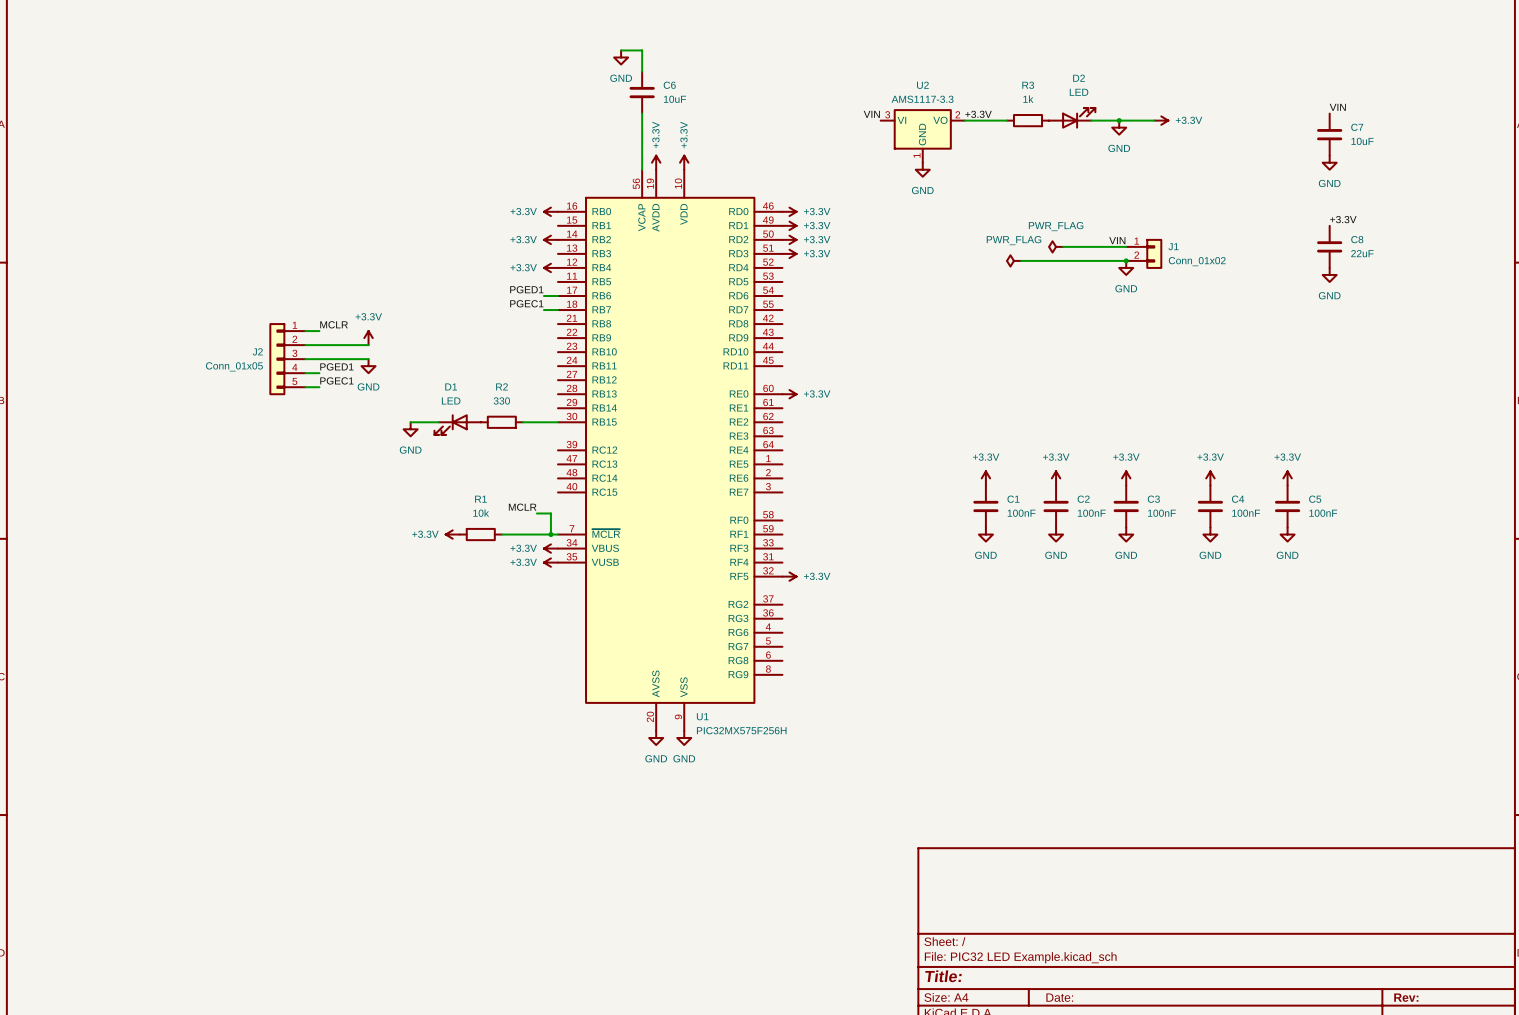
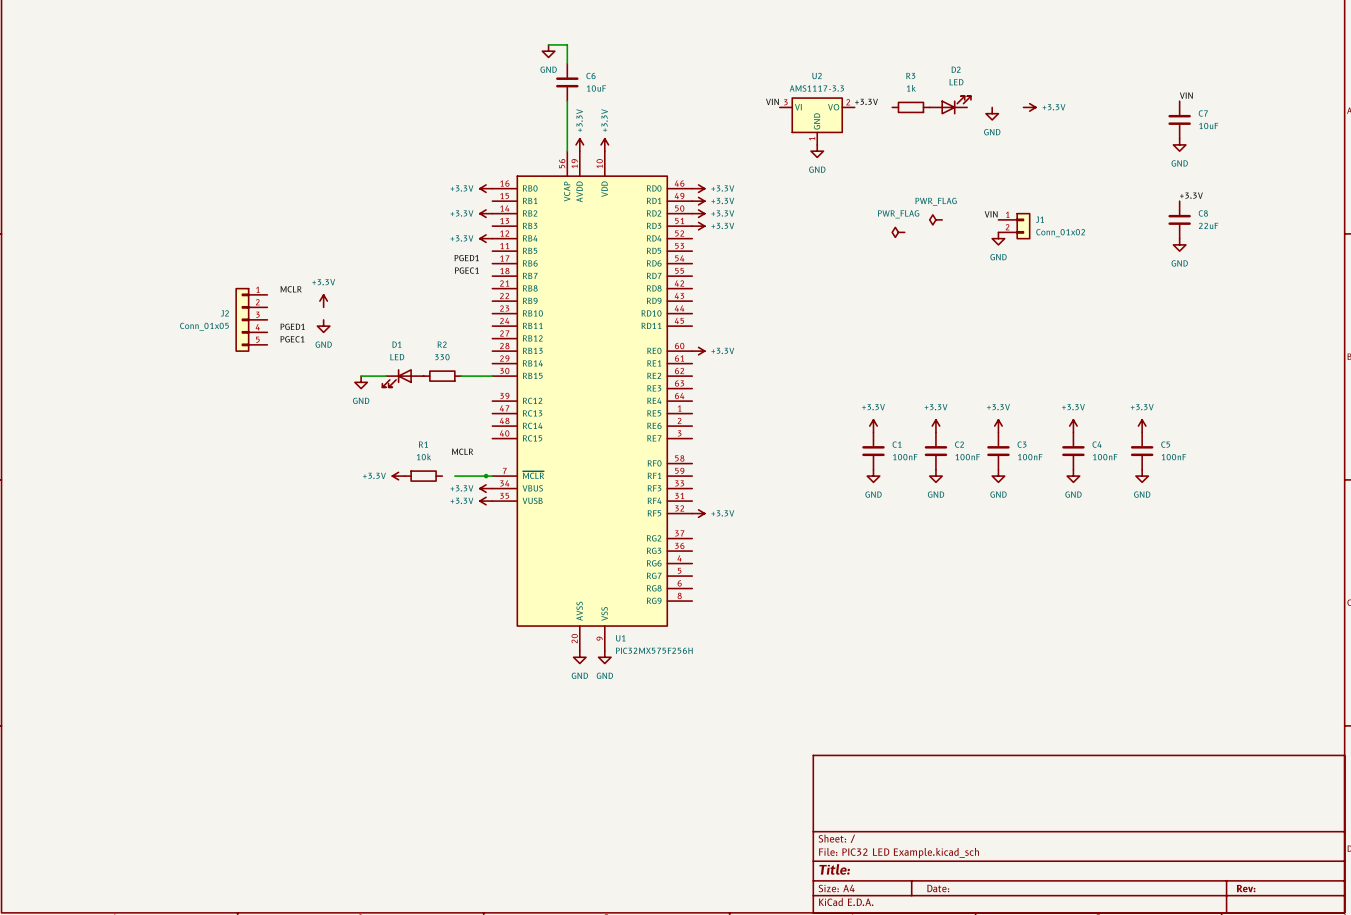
wire: (964, 120) (1006, 120) -> none
wire: (1091, 120) (1154, 120) -> none
junction: (1119, 120) -> none
wire: (1063, 246) (1126, 246) -> none
wire: (1020, 260) (1126, 260) -> none
junction: (1126, 260) -> none
wire: (543, 296) (557, 296) -> none
wire: (543, 310) (557, 310) -> none
wire: (305, 331) (319, 331) -> none
wire: (305, 345) (368, 345) -> none
wire: (305, 359) (368, 359) -> none
wire: (305, 373) (319, 373) -> none
wire: (305, 387) (319, 387) -> none
wire: (536, 513) (550, 513) (550, 534) -> none
wire: (501, 534) (515, 534) -> none

